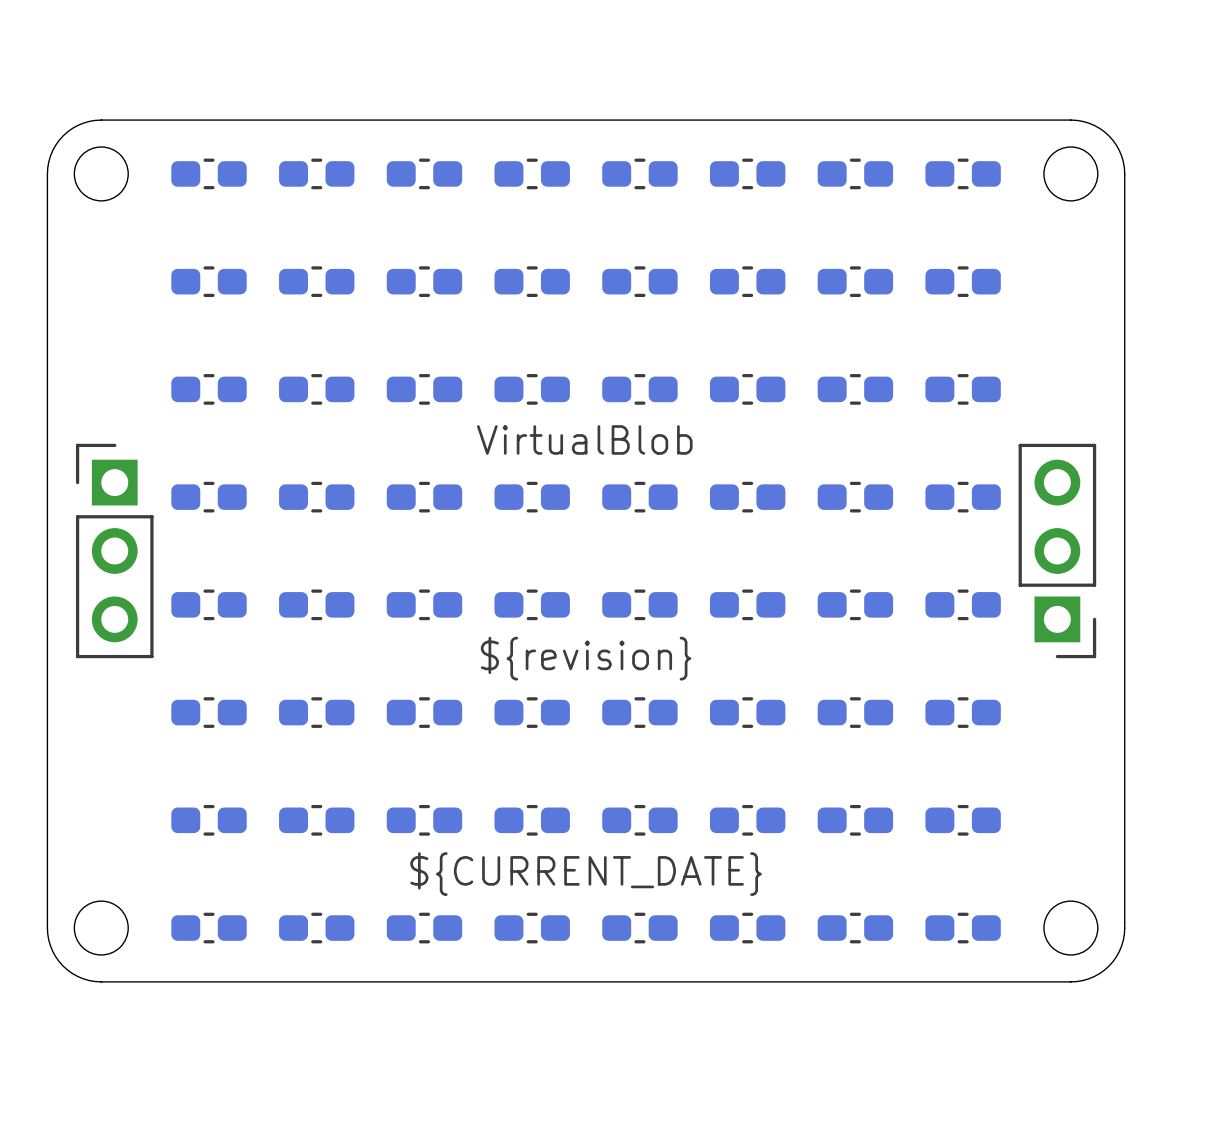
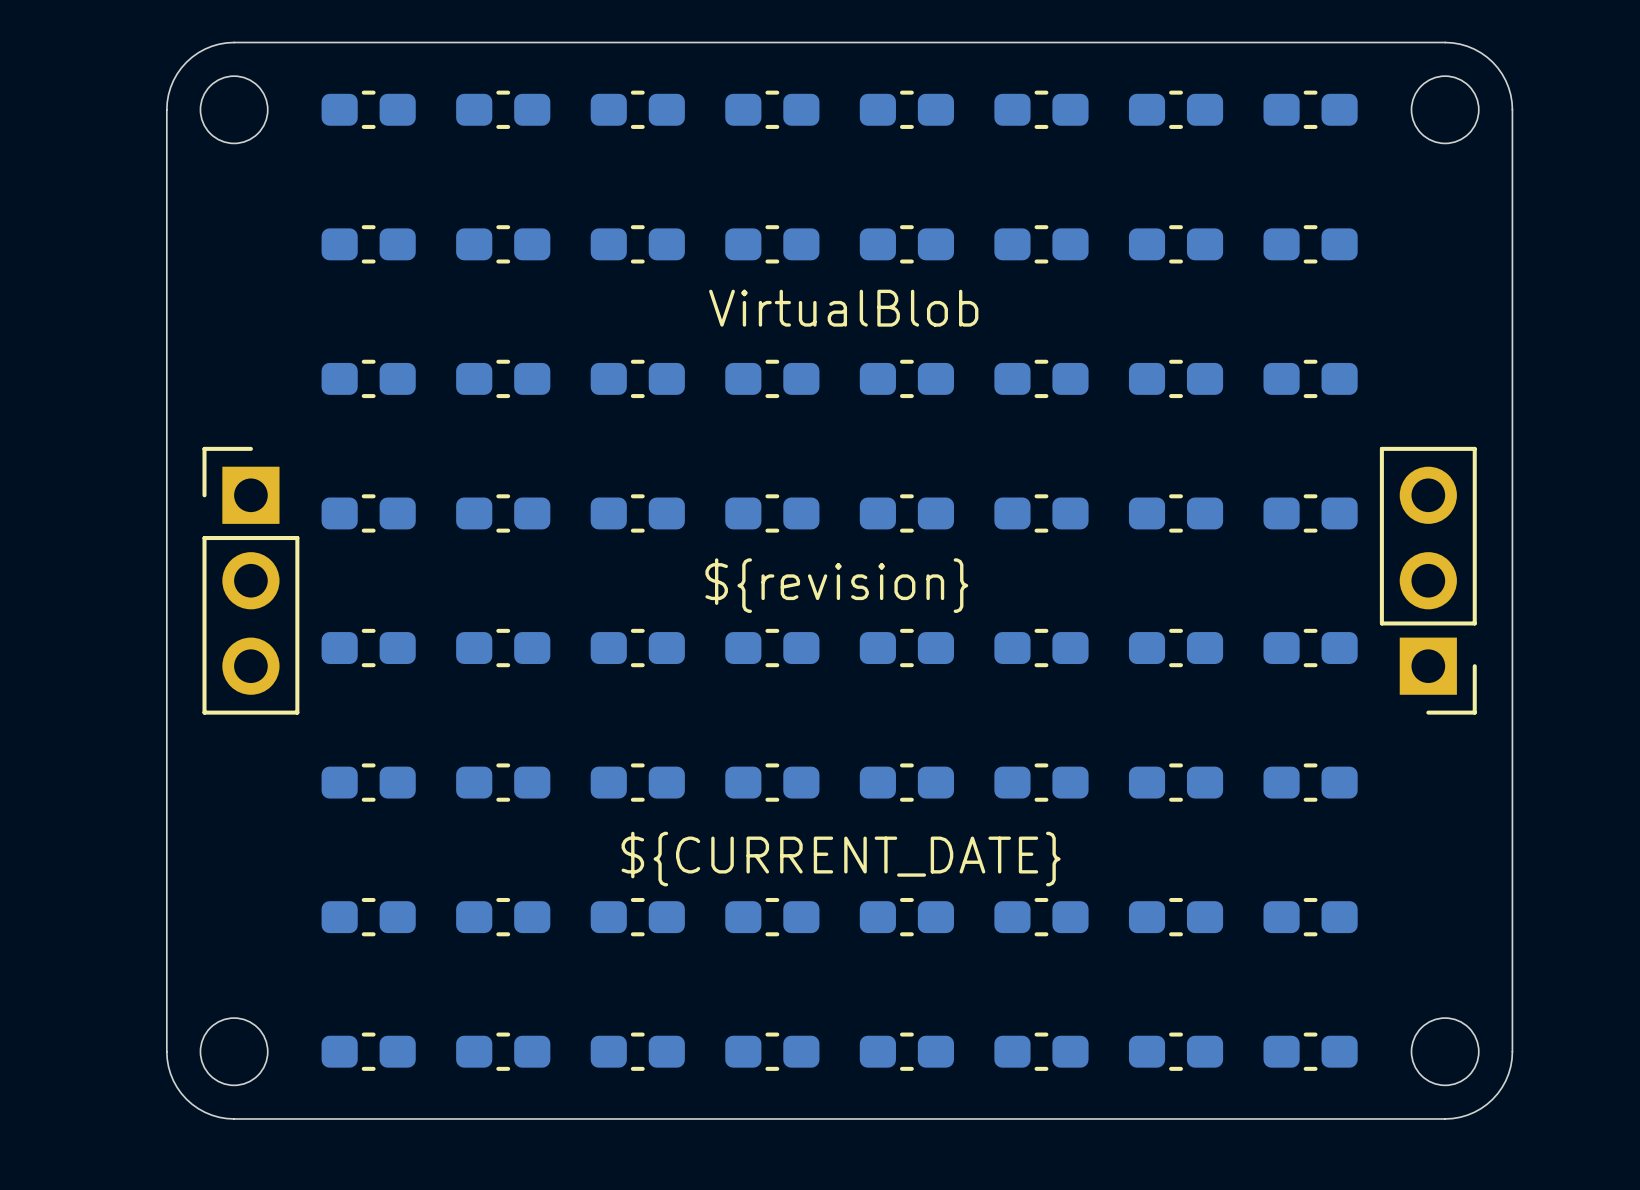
text position: VirtualBlob (584, 439) -> VirtualBlob (843, 308)
text position: ${revision} (586, 658) -> ${revision} (836, 585)
text position: ${CURRENT_DATE} (586, 874) -> ${CURRENT_DATE} (841, 859)

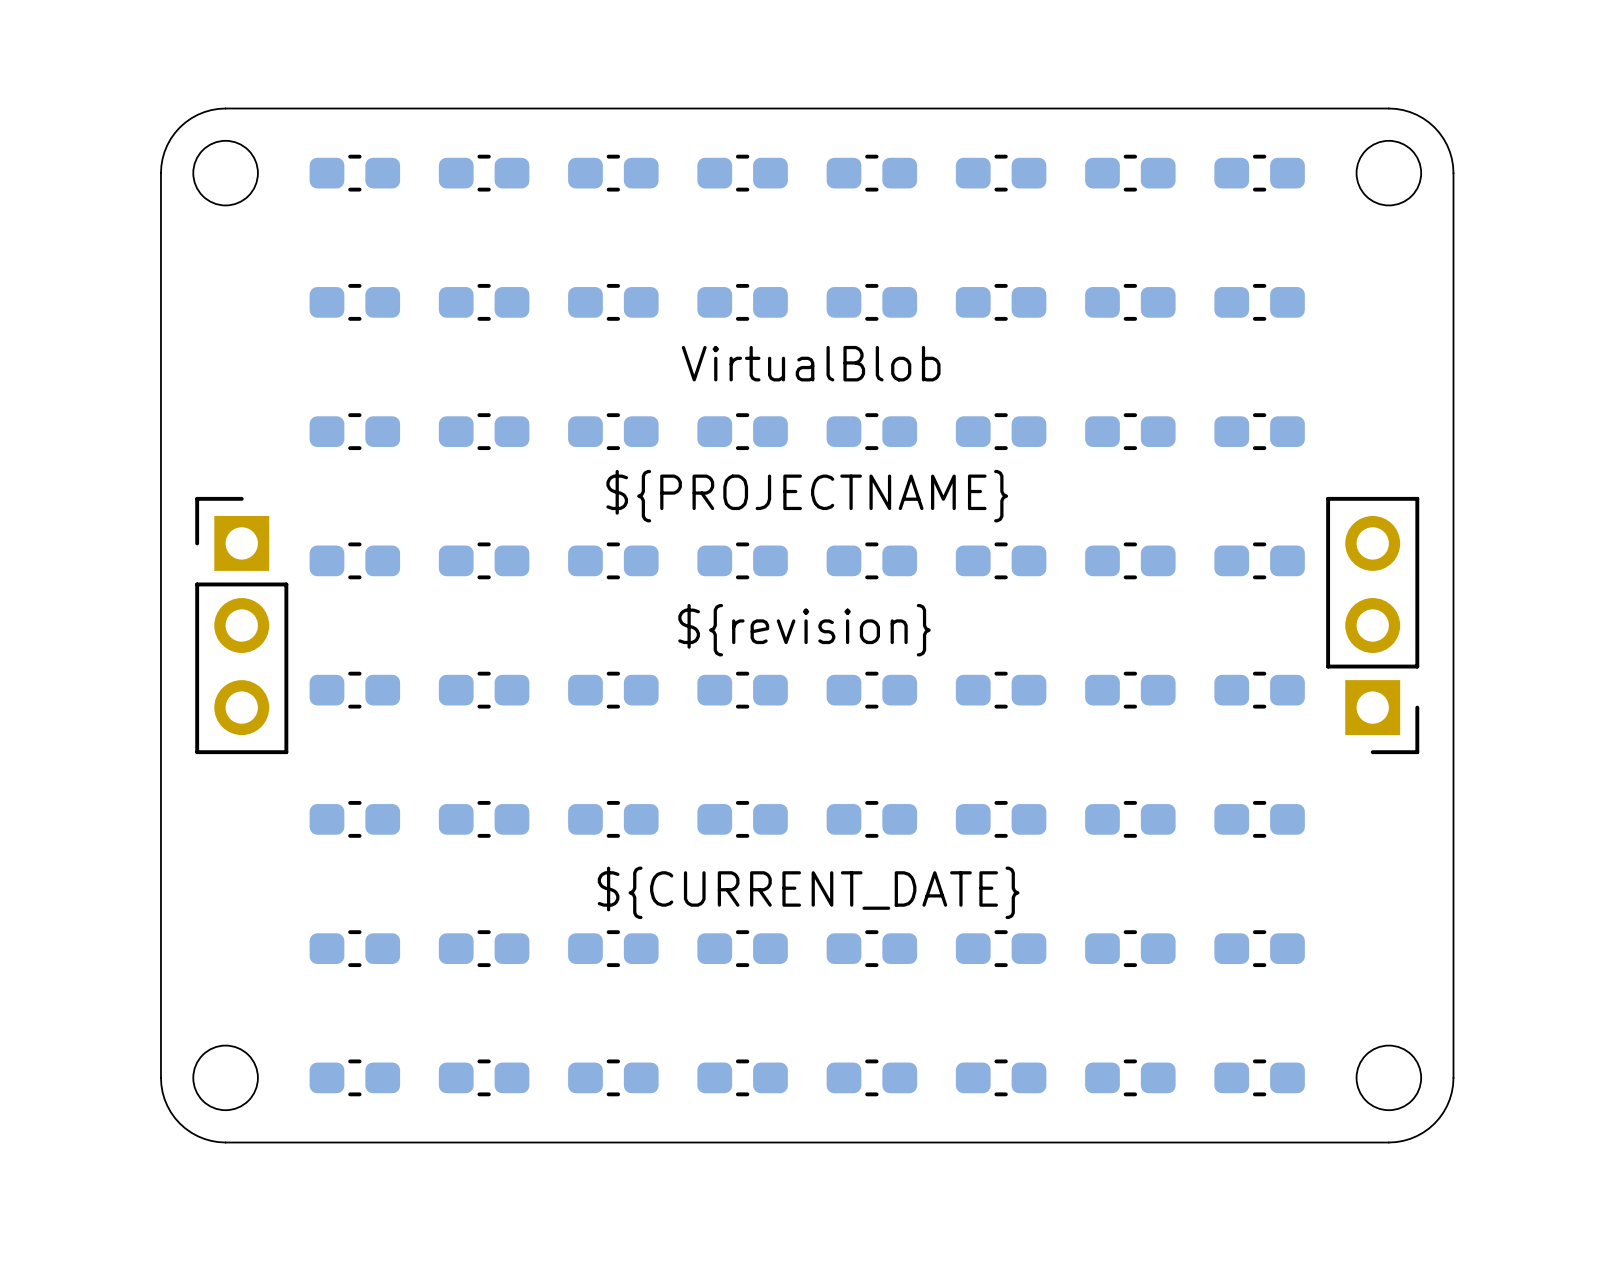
text: none -> ${PROJECTNAME} (807, 496)

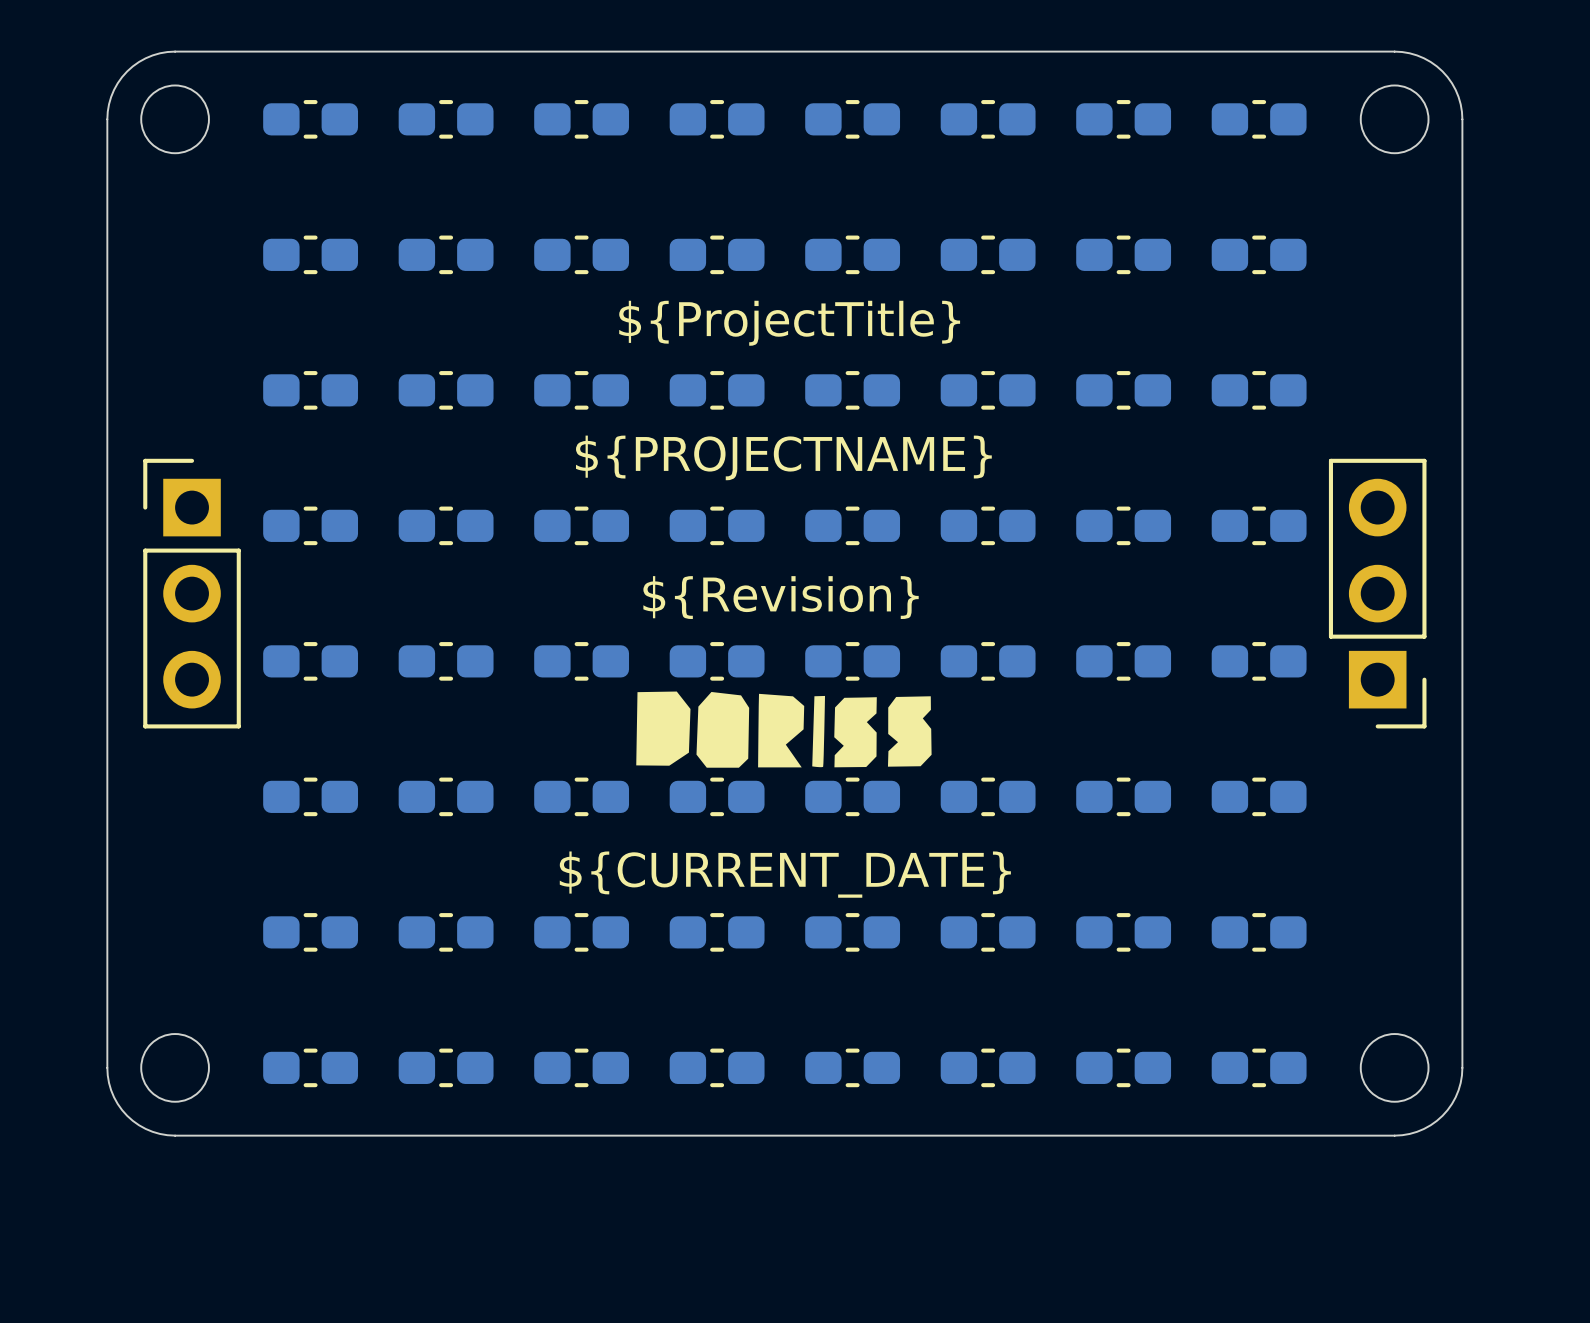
text: VirtualBlob (811, 363) -> ${ProjectTitle} (789, 323)
text: ${revision} (804, 630) -> ${Revision} (781, 597)
drawing: none -> [636, 691, 932, 768]

